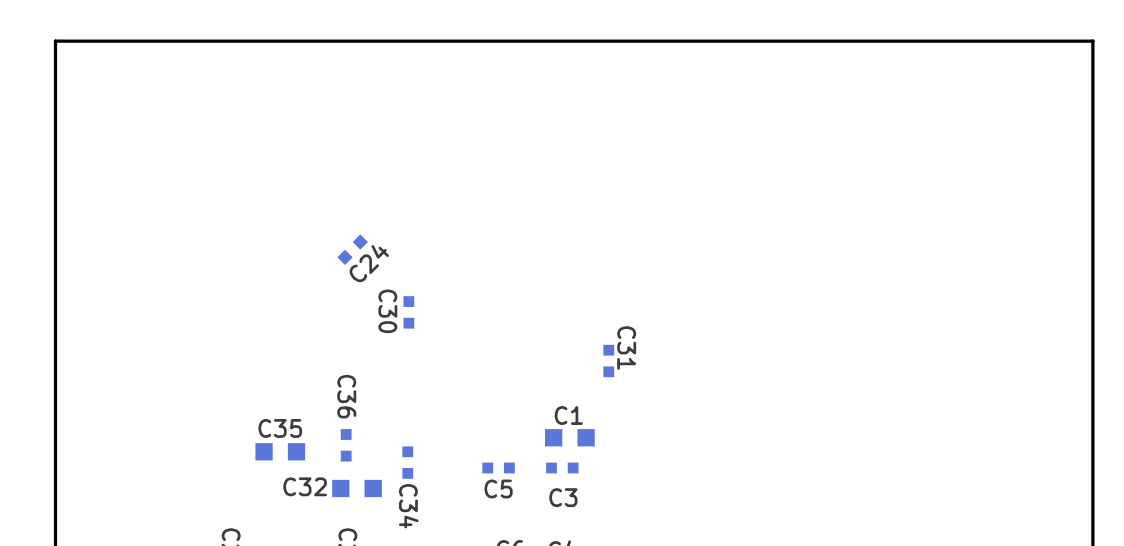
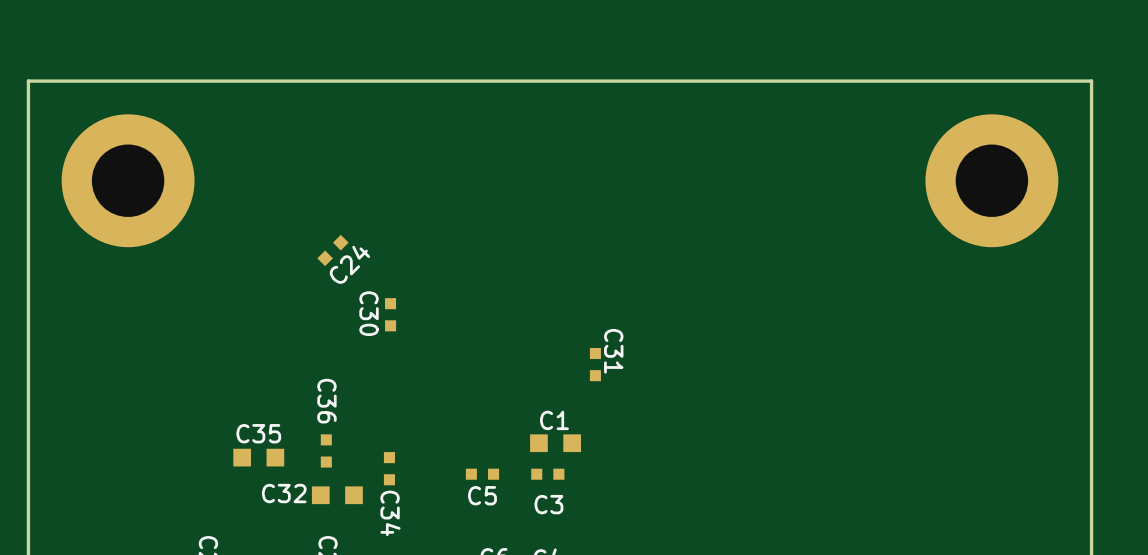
board edge: (1092, 84) (1092, 41) (55, 41) (55, 84) -> (1091, 81) (28, 81)
part: none -> (128, 180)
part: none -> (991, 180)

